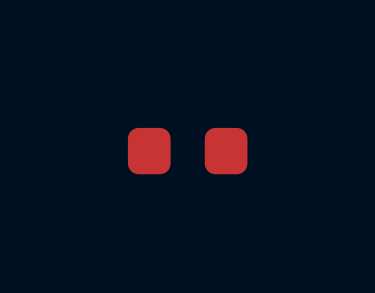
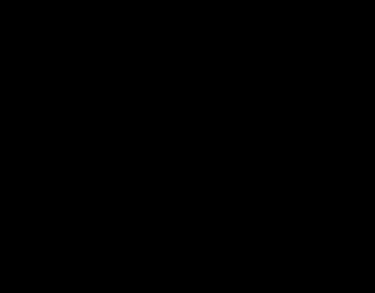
part: (187, 151) -> none

